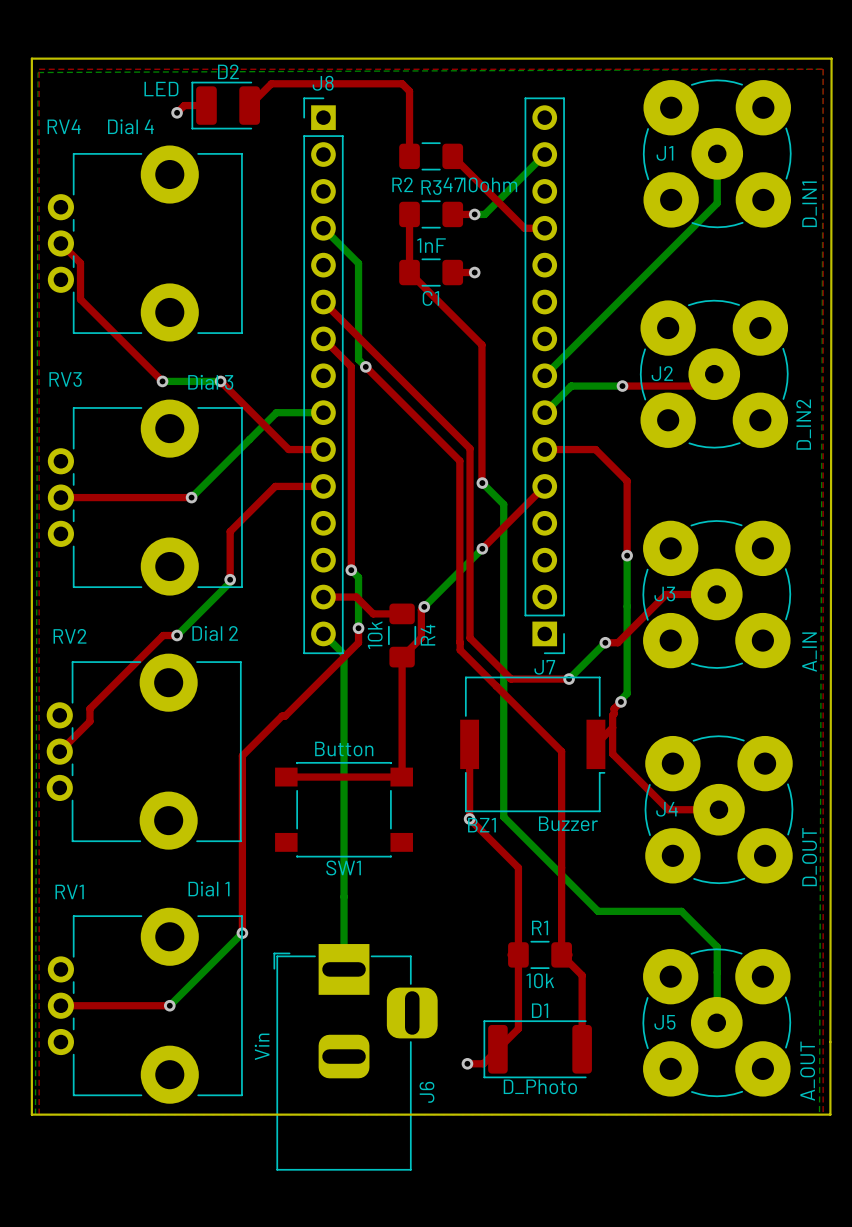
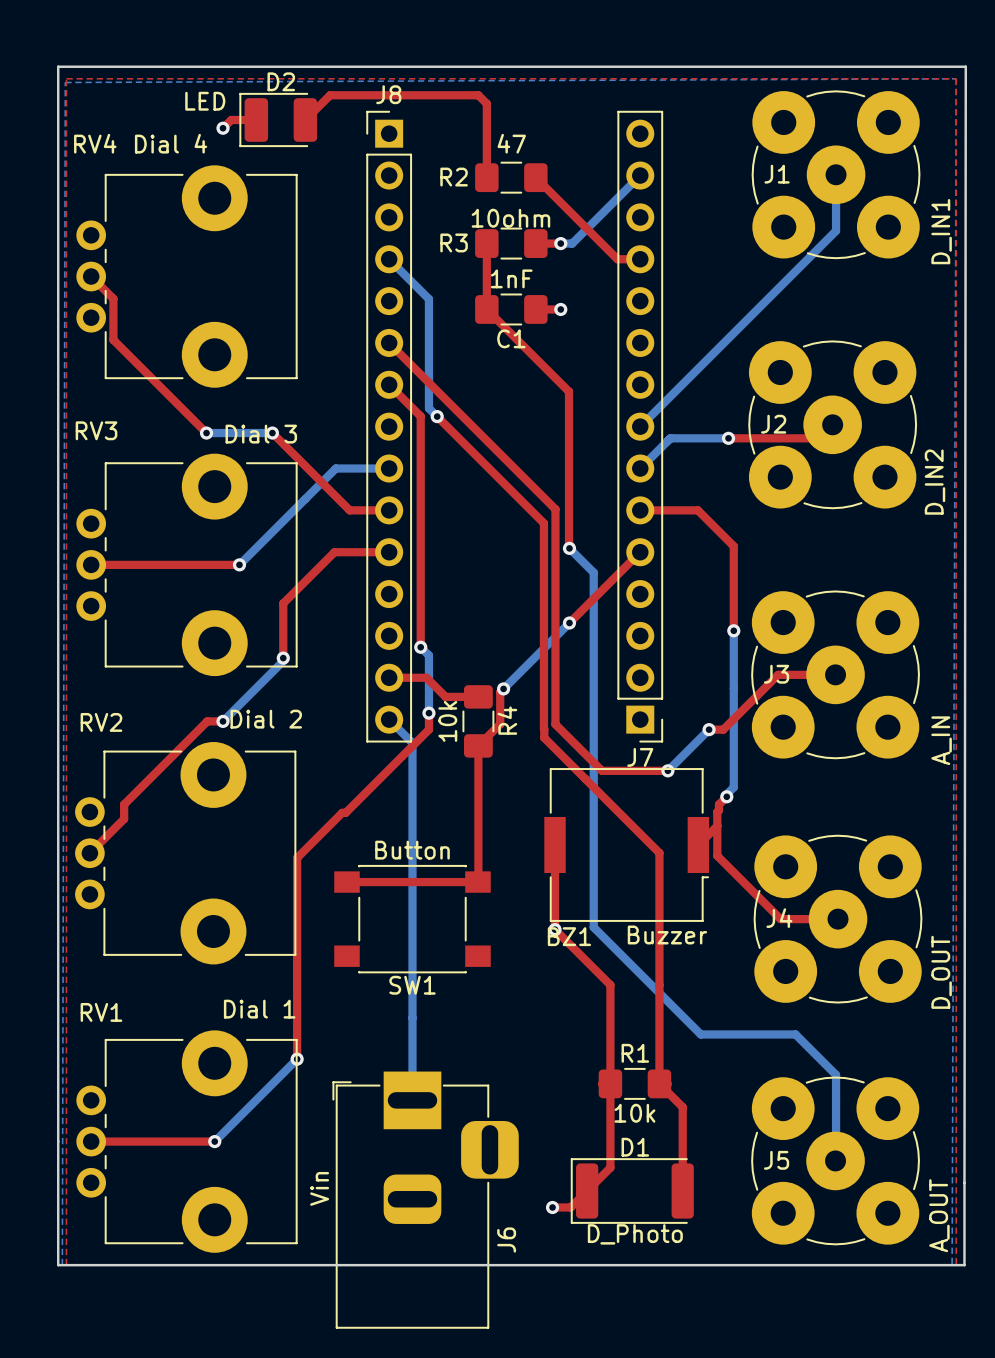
R2 name position: R2 (402, 184) -> R2 (454, 177)
R2 value position: 47 (453, 184) -> 47 (511, 143)
R3 value position: 10ohm (489, 184) -> 10ohm (510, 218)
R3 name position: R3 (431, 187) -> R3 (454, 242)

